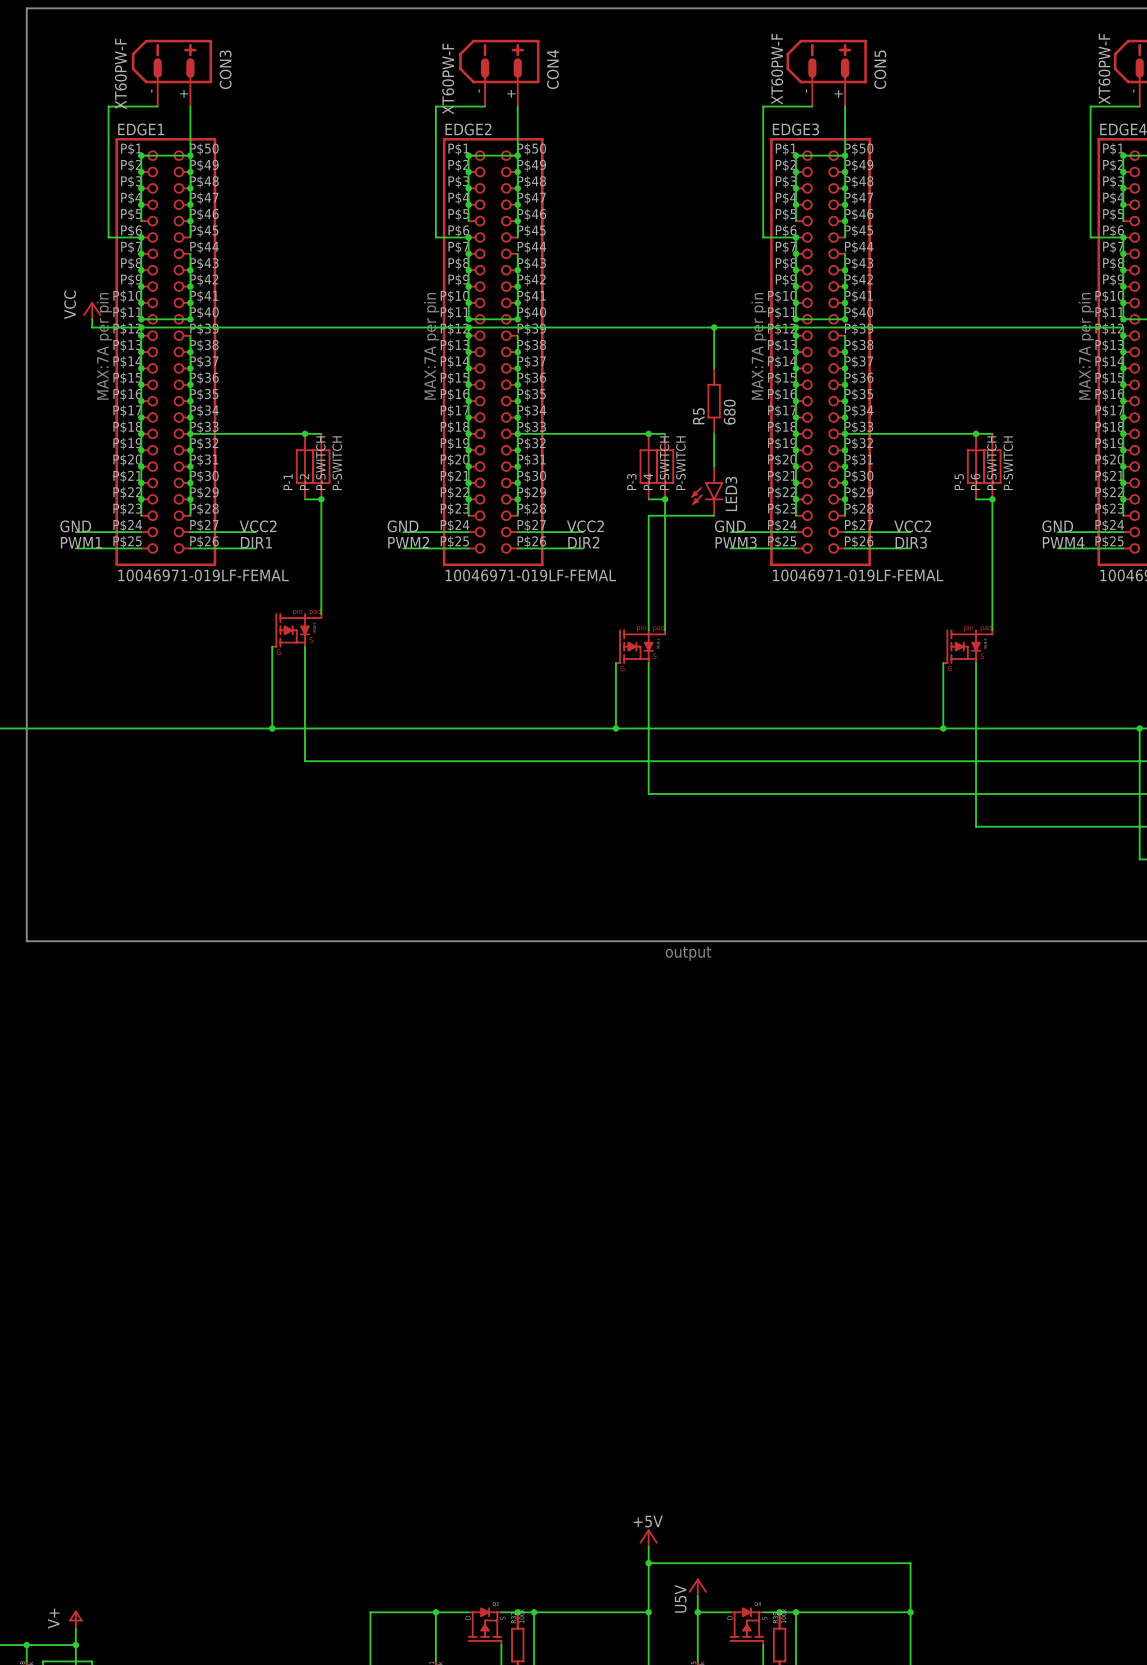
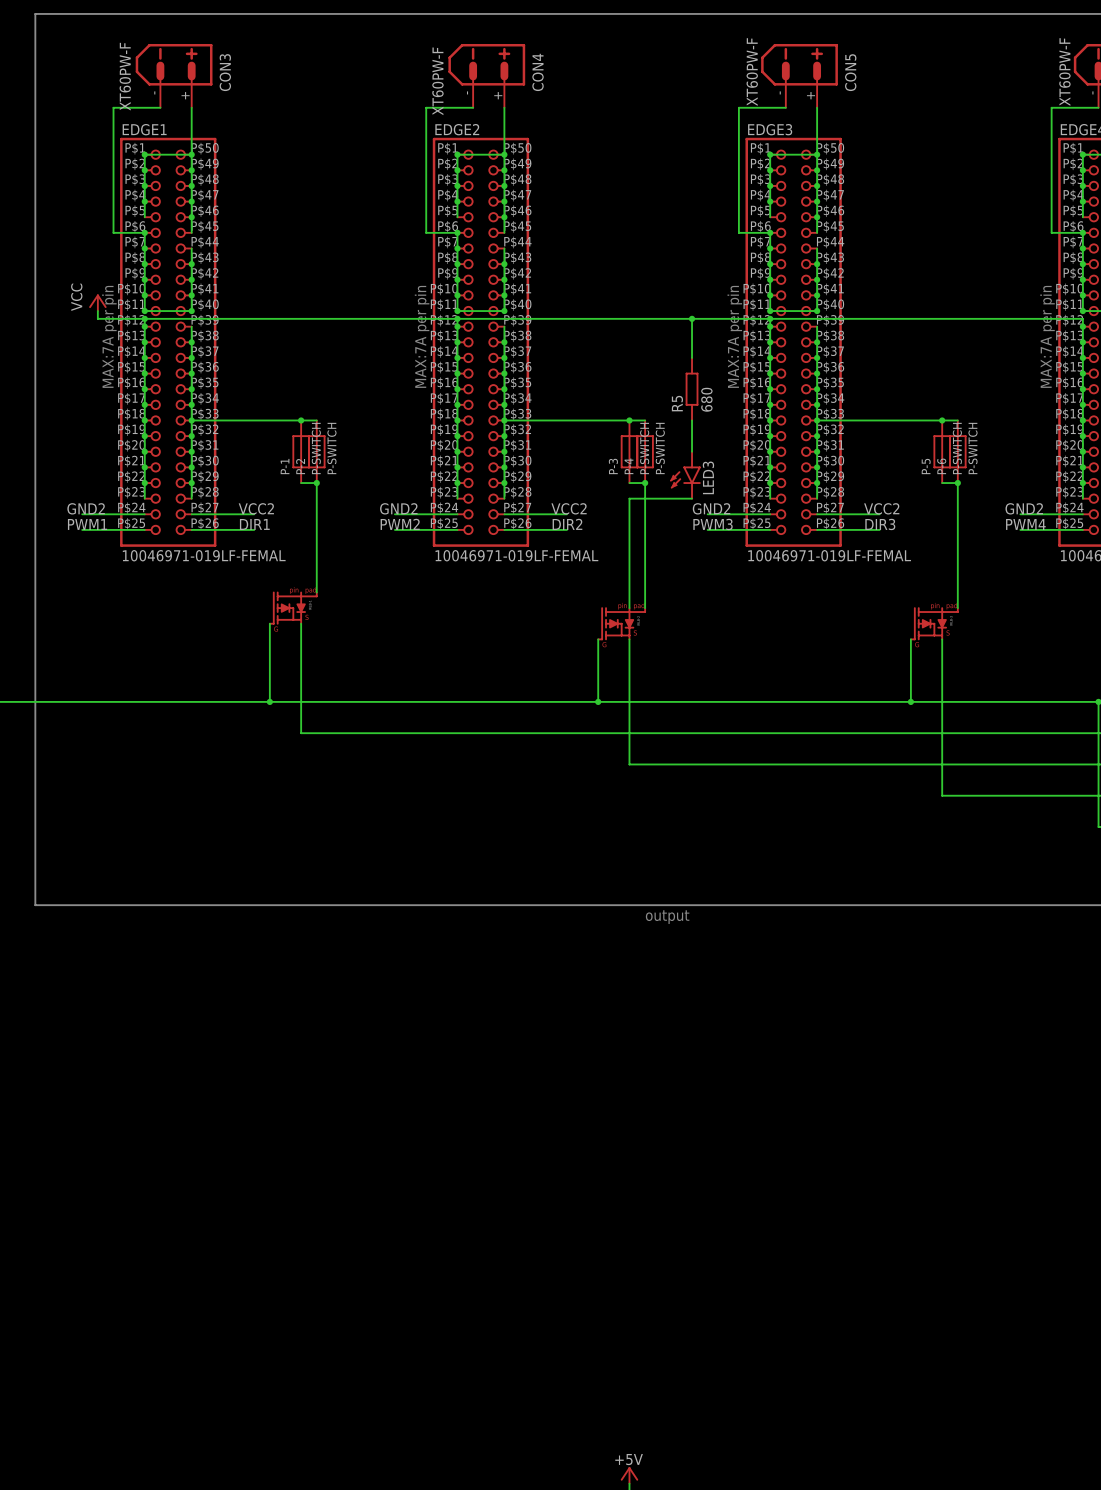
label: GND (75, 526) -> GND2 (86, 508)
label: GND (403, 526) -> GND2 (398, 508)
label: GND (730, 526) -> GND2 (711, 508)
label: GND (1057, 526) -> GND2 (1024, 508)

